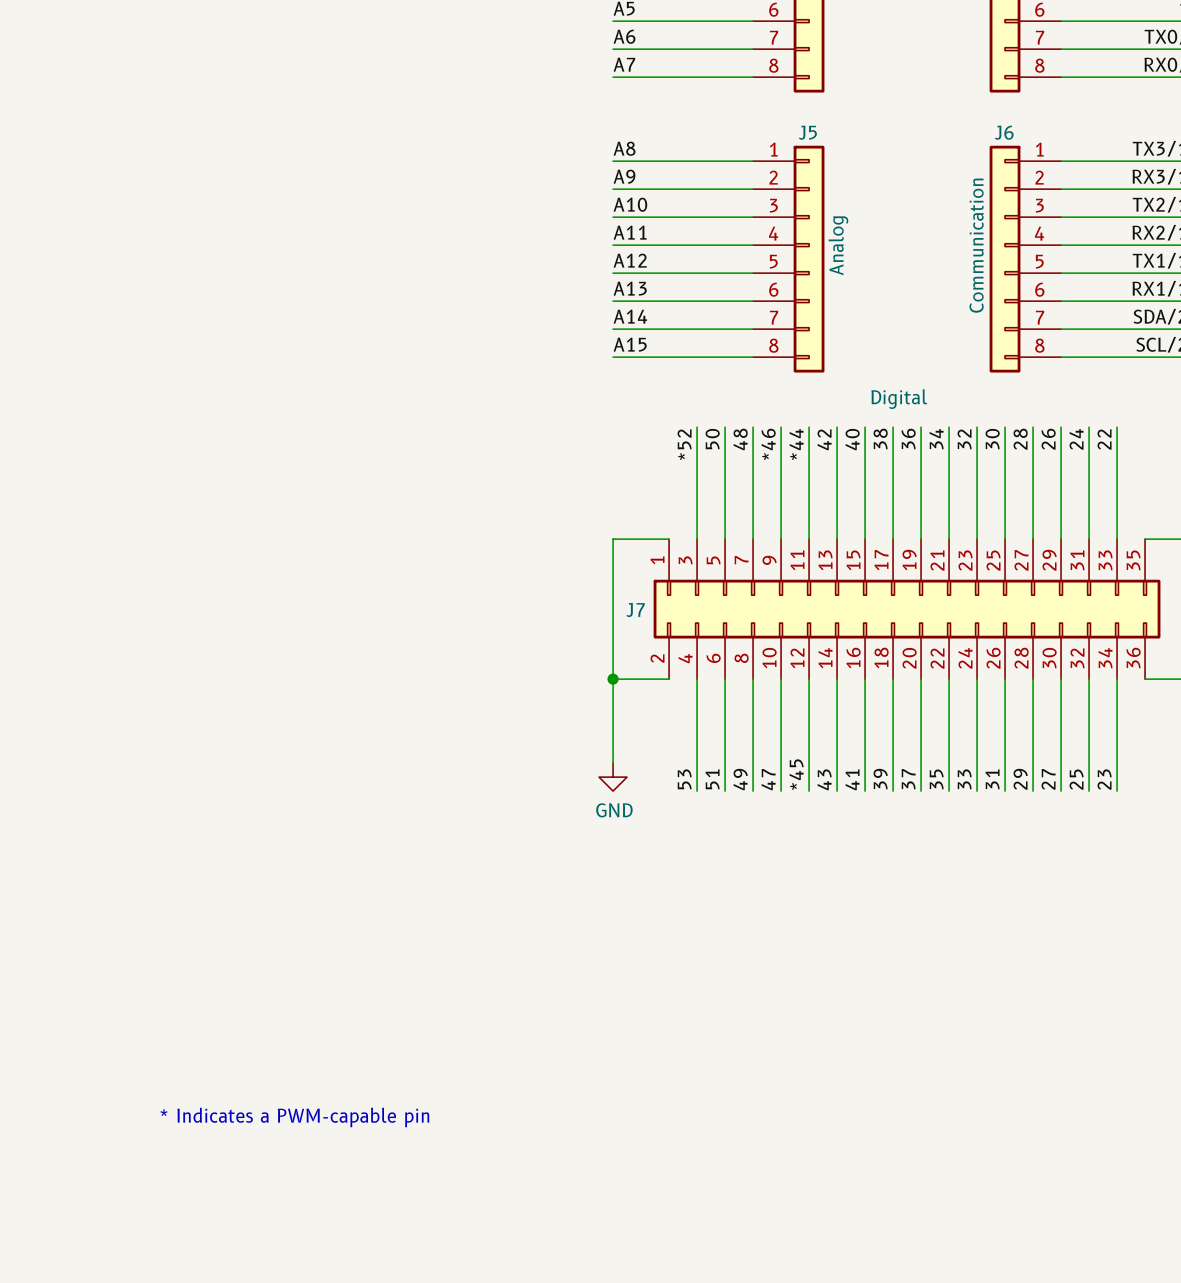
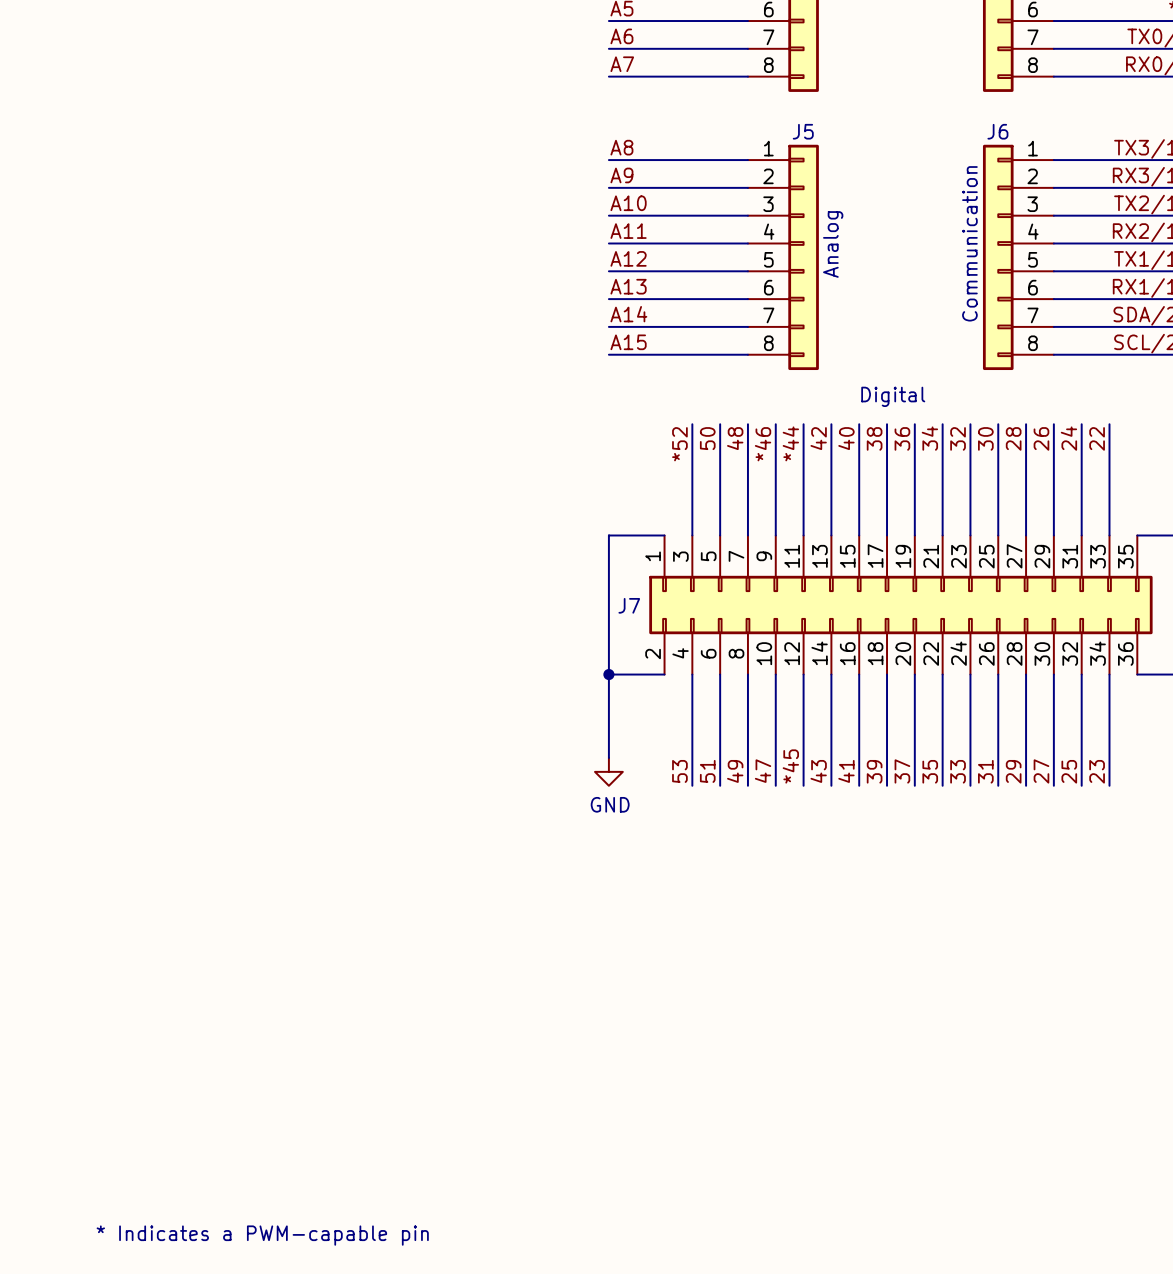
text: * Indicates a PWM-capable pin (294, 1117) -> none
text: none -> * Indicates a PWM-capable pin (262, 1235)

